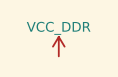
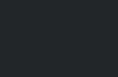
power symbol: VCC_DDR (58, 46) -> none

